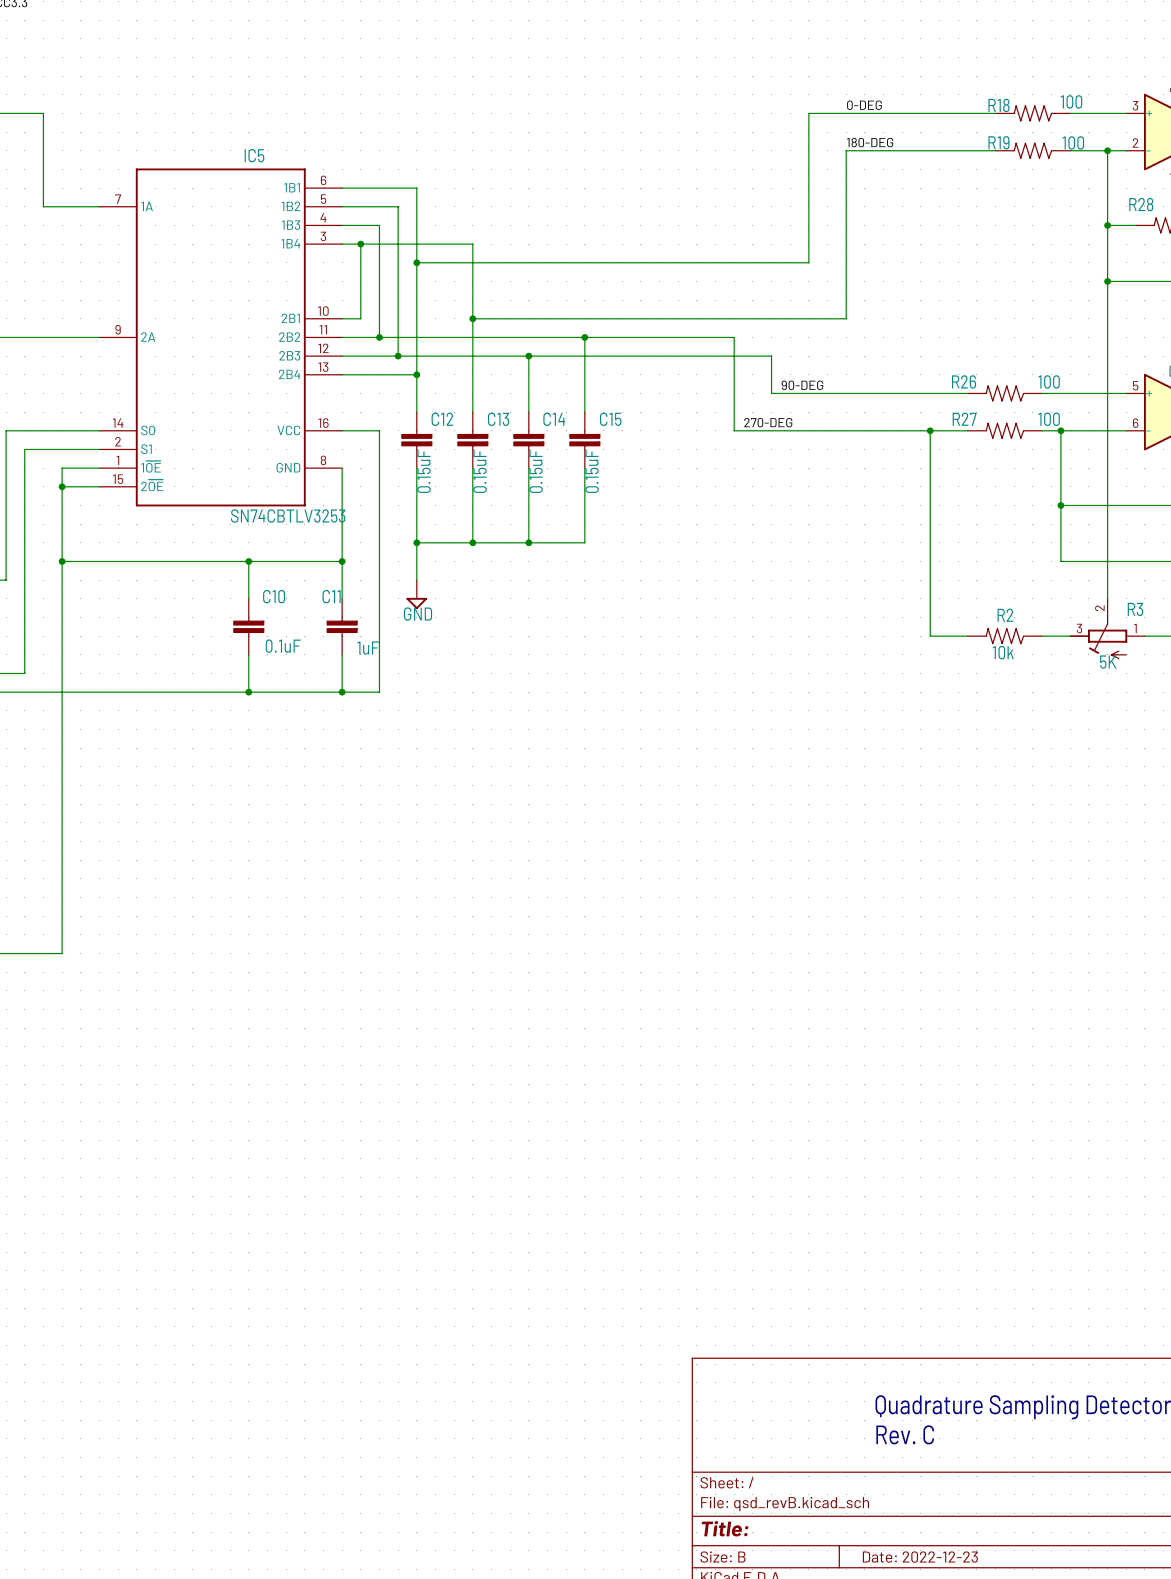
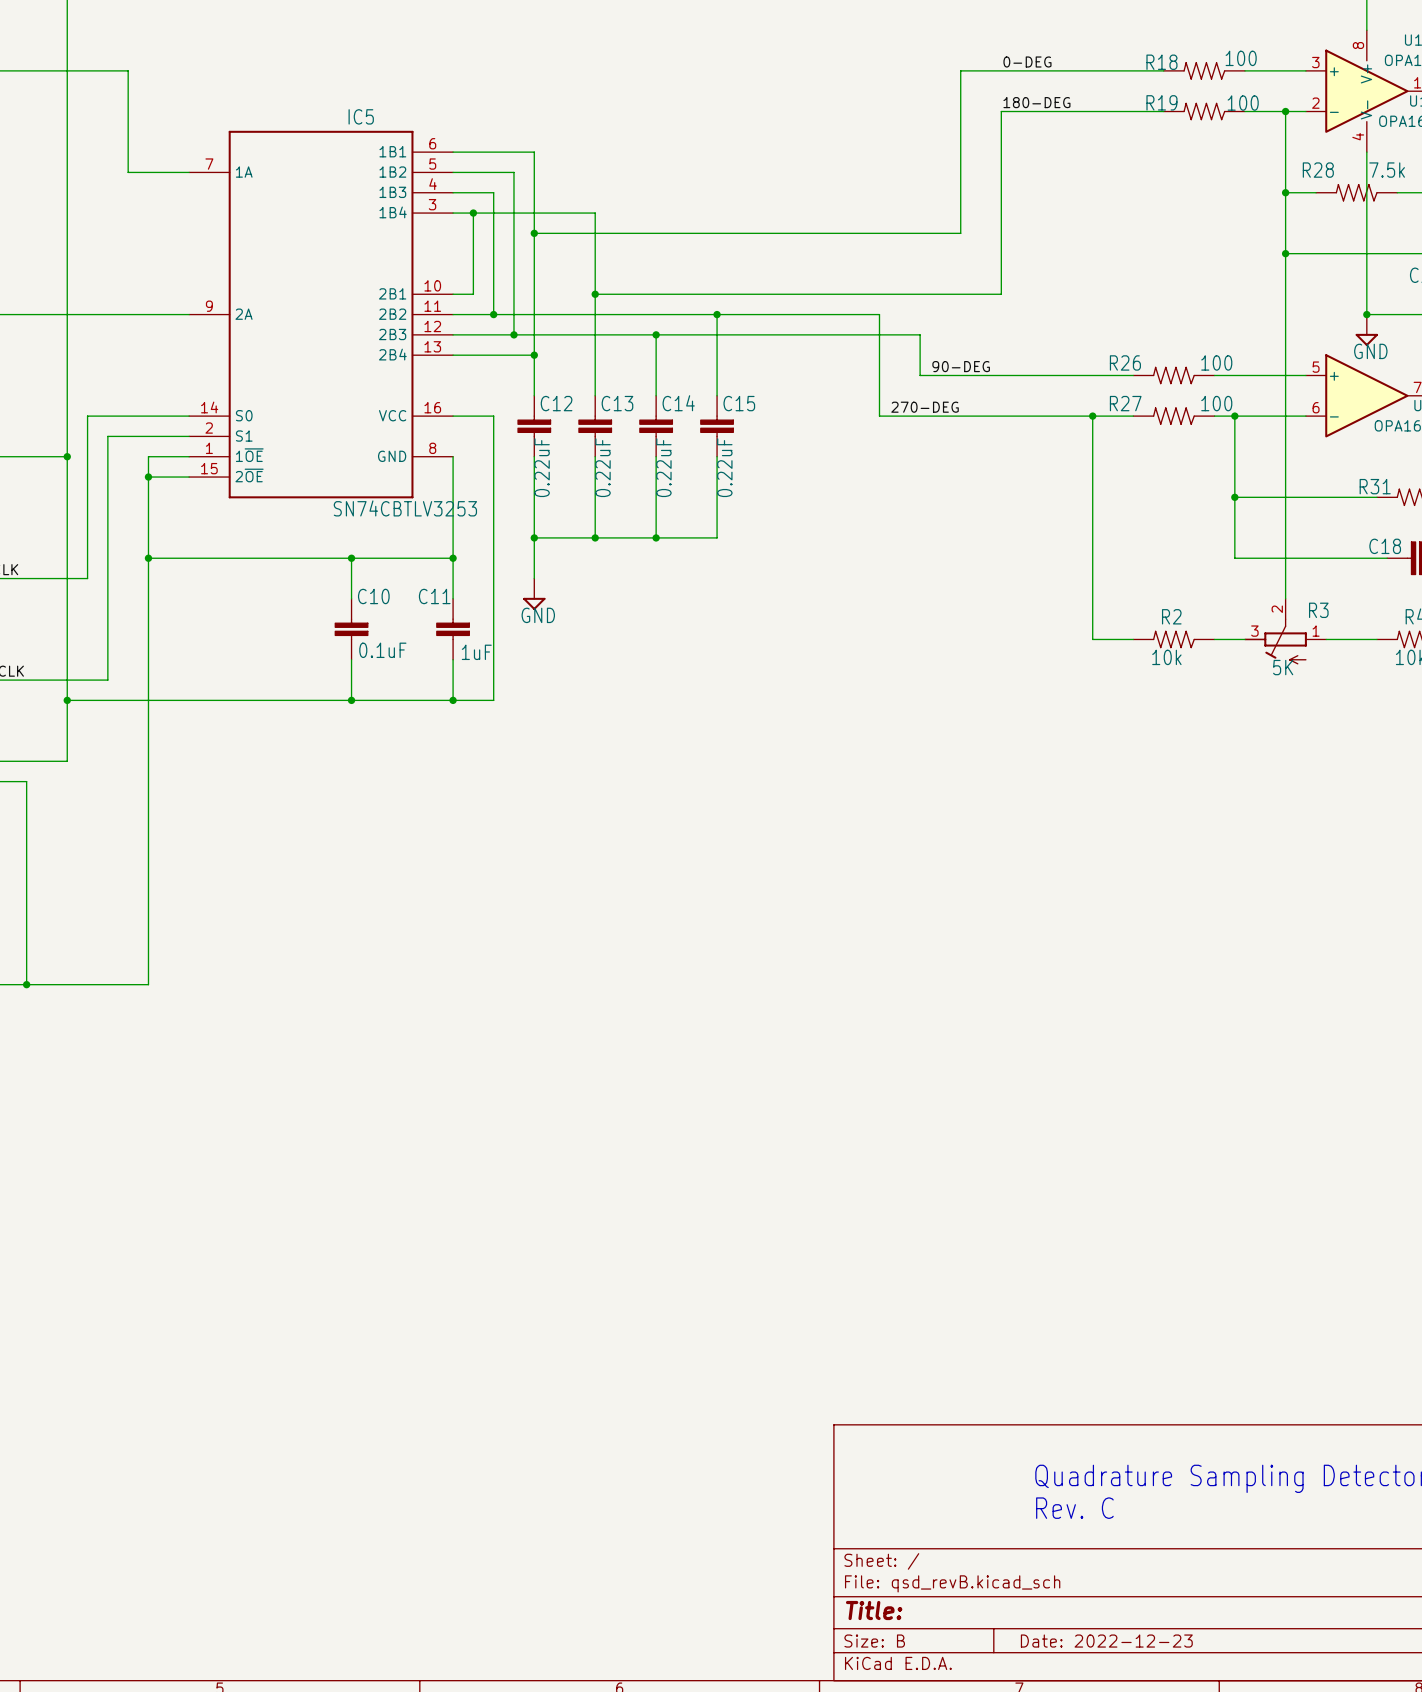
C12 value: 0.15uF (423, 471) -> 0.22uF (542, 467)
C13 value: 0.15uF (479, 471) -> 0.22uF (602, 467)
C14 value: 0.15uF (535, 471) -> 0.22uF (663, 467)
C15 value: 0.15uF (592, 471) -> 0.22uF (724, 467)

